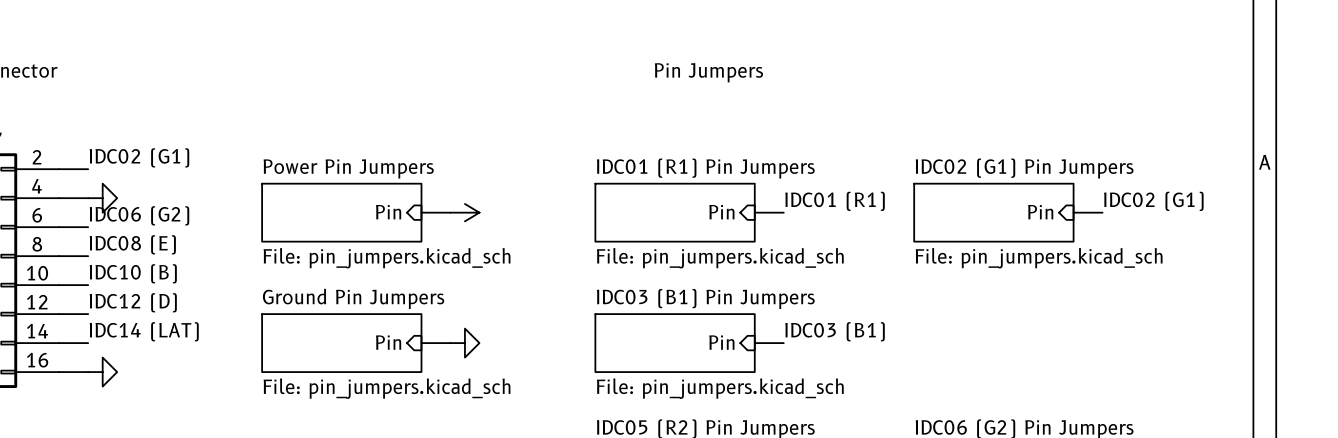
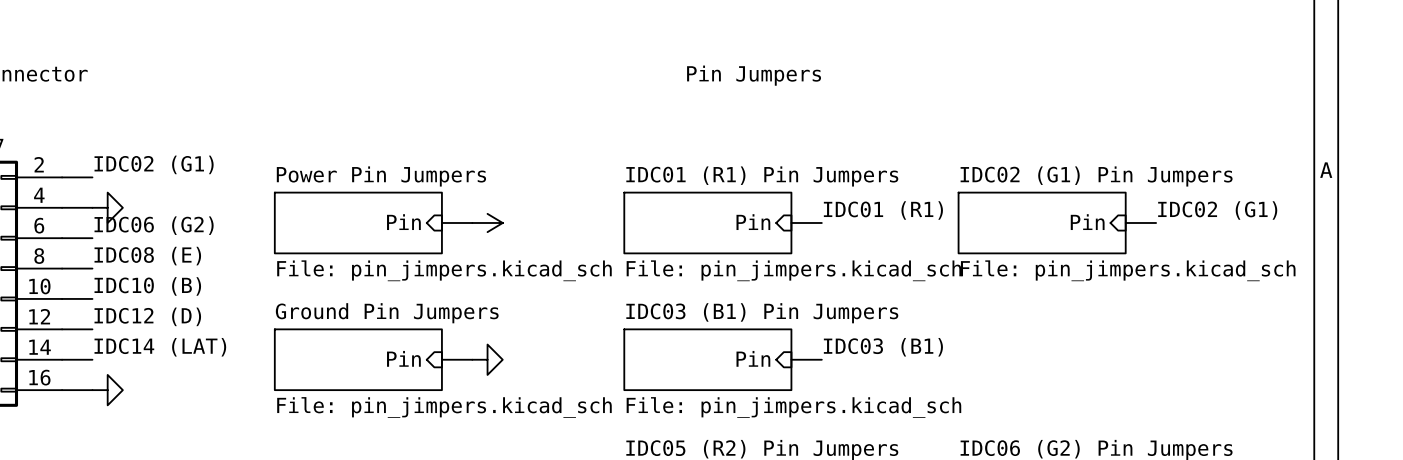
sheet Power Pin Jumpers value: File: pin_jumpers.kicad_sch (387, 258) -> File: pin_jimpers.kicad_sch (444, 270)
sheet IDC01 (R1) Pin Jumpers value: File: pin_jumpers.kicad_sch (720, 258) -> File: pin_jimpers.kicad_sch (793, 270)
sheet IDC02 (G1) Pin Jumpers value: File: pin_jumpers.kicad_sch (1039, 258) -> File: pin_jimpers.kicad_sch (1128, 270)
sheet Ground Pin Jumpers value: File: pin_jumpers.kicad_sch (387, 388) -> File: pin_jimpers.kicad_sch (444, 407)
sheet IDC03 (B1) Pin Jumpers value: File: pin_jumpers.kicad_sch (720, 388) -> File: pin_jimpers.kicad_sch (793, 407)

